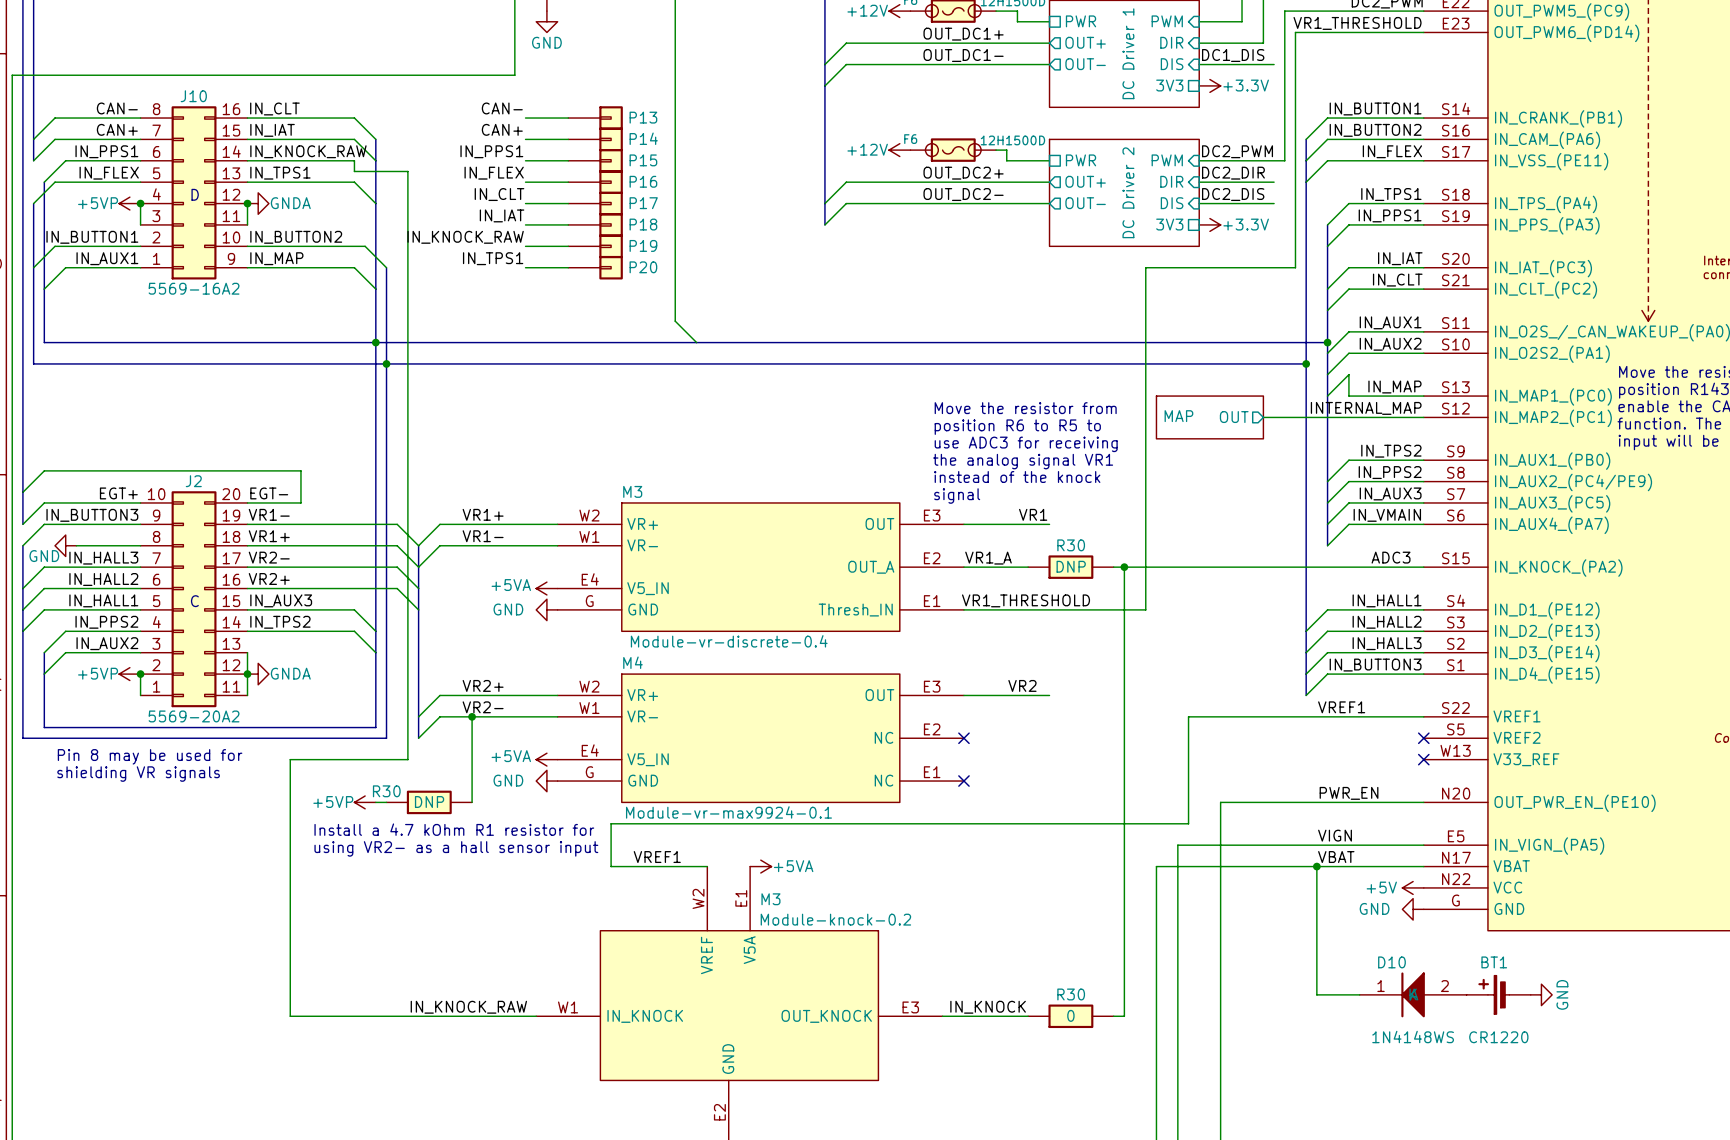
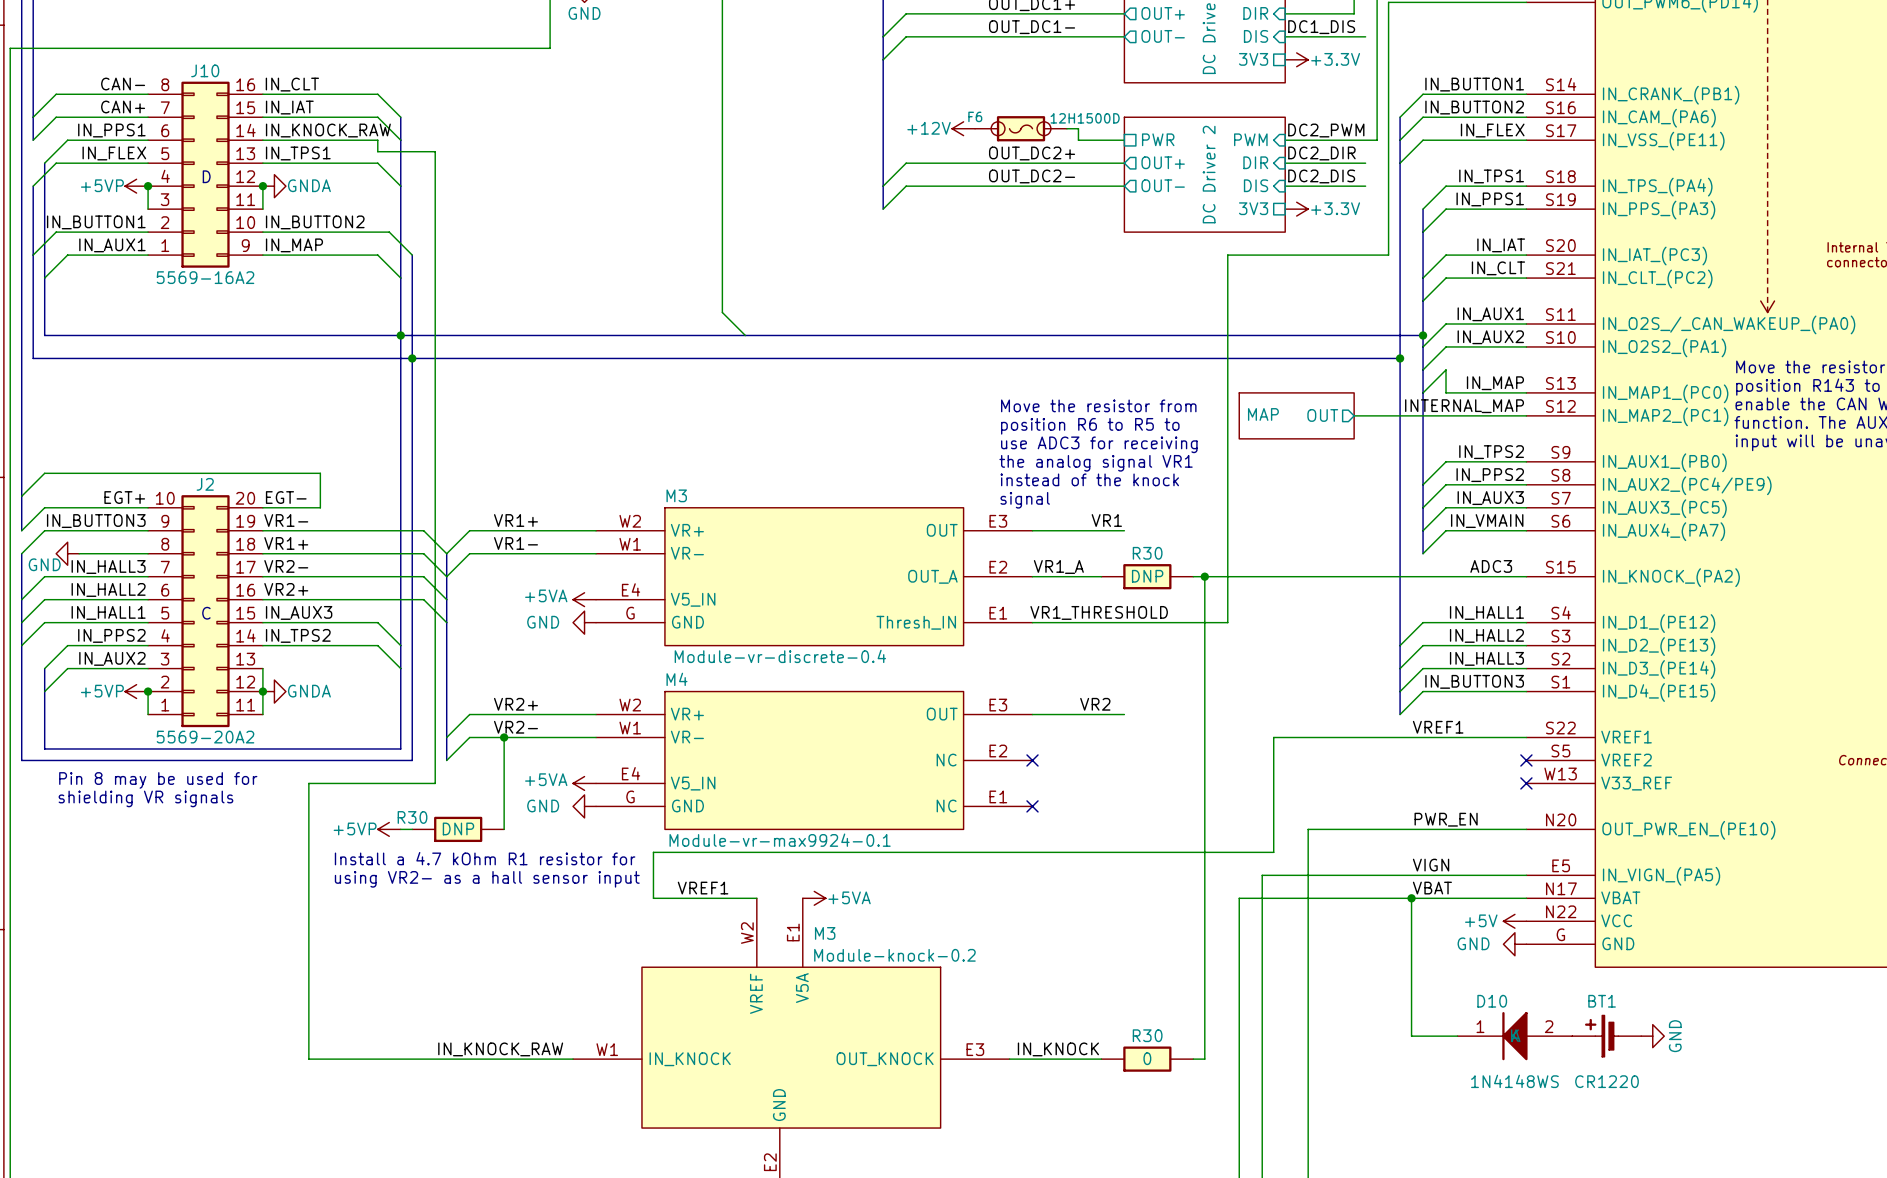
label: CAN- (502, 108) -> none
wire: (525, 118) (568, 118) -> none
P13: (595, 118) -> none
label: CAN+ (502, 129) -> none
wire: (525, 139) (568, 139) -> none
P14: (595, 139) -> none
label: IN_PPS1 (491, 151) -> none
wire: (525, 160) (568, 160) -> none
P15: (595, 160) -> none
label: IN_FLEX (494, 173) -> none
wire: (525, 182) (568, 182) -> none
P16: (595, 182) -> none
label: IN_CLT (499, 194) -> none
wire: (525, 203) (568, 203) -> none
P17: (595, 203) -> none
label: IN_IAT (502, 215) -> none
wire: (525, 224) (568, 224) -> none
P18: (595, 224) -> none
label: IN_KNOCK_RAW (465, 237) -> none
wire: (525, 246) (568, 246) -> none
P19: (595, 246) -> none
label: IN_TPS1 (493, 258) -> none
wire: (525, 267) (568, 267) -> none
P20: (595, 267) -> none

